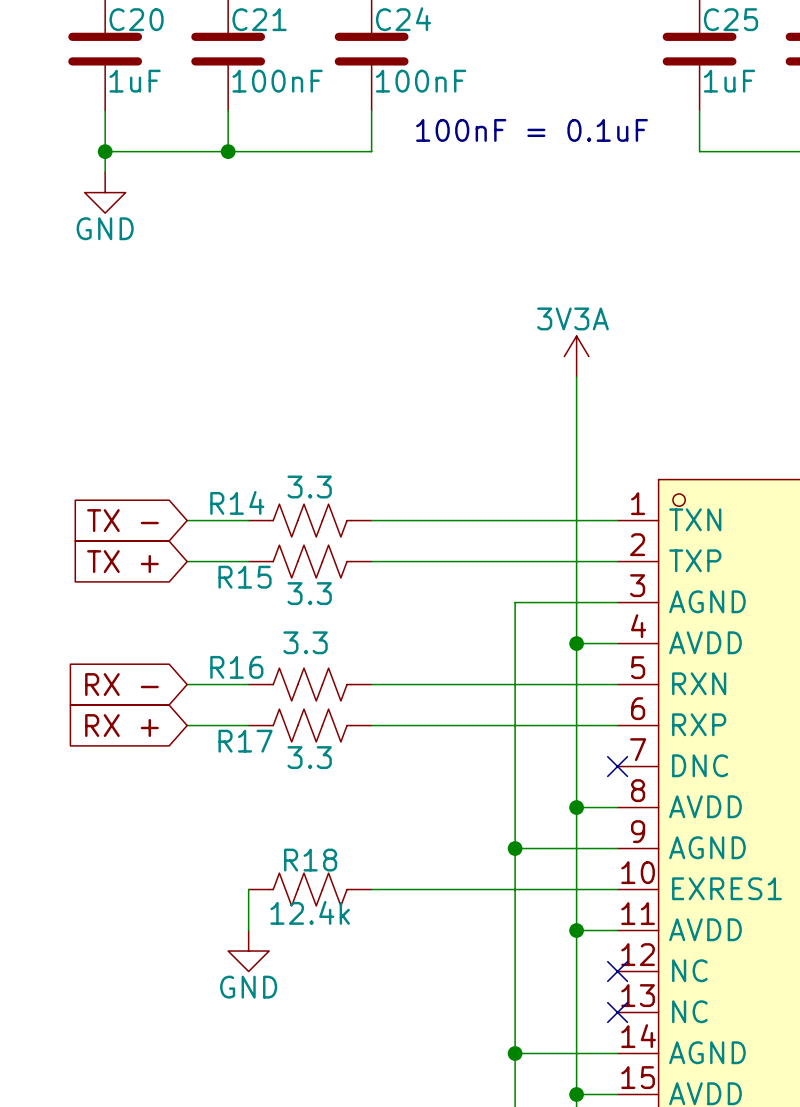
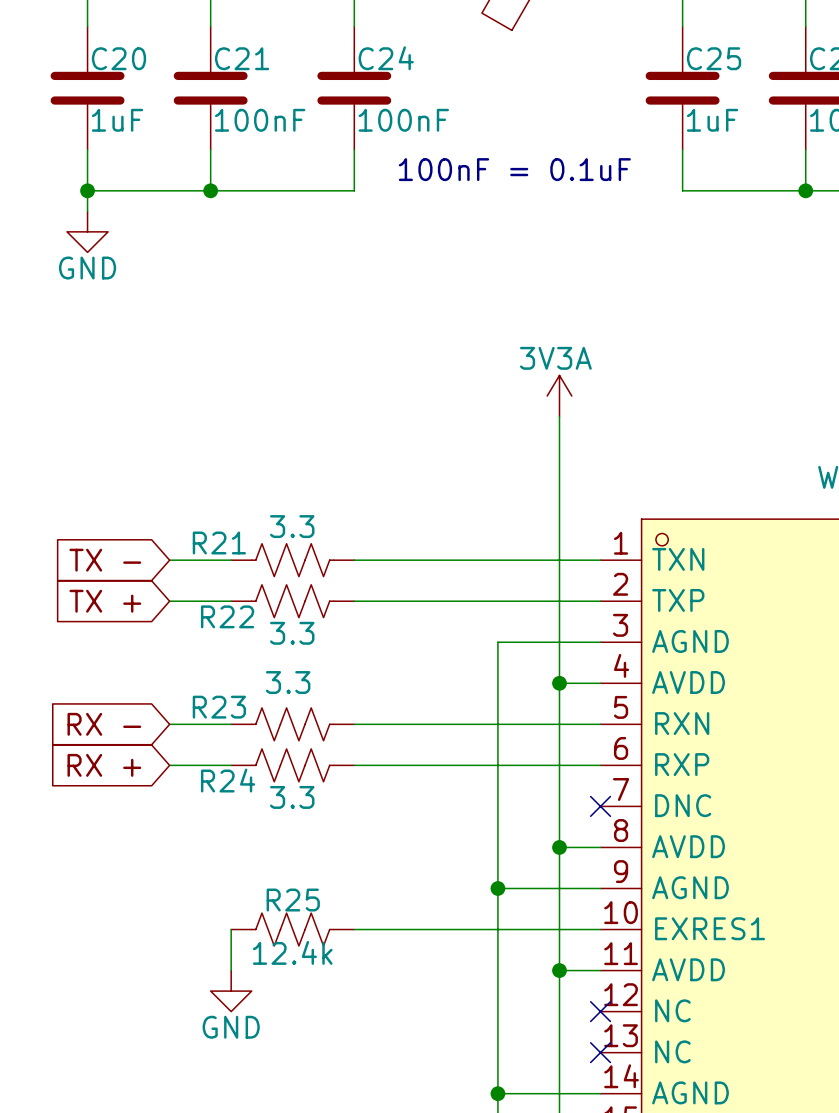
R14 name: R14 (237, 502) -> R21 (219, 542)
R15 name: R15 (245, 577) -> R22 (227, 616)
R16 name: R16 (236, 667) -> R23 (219, 707)
R17 name: R17 (245, 741) -> R24 (228, 780)
R18 name: R18 (310, 860) -> R25 (293, 900)

